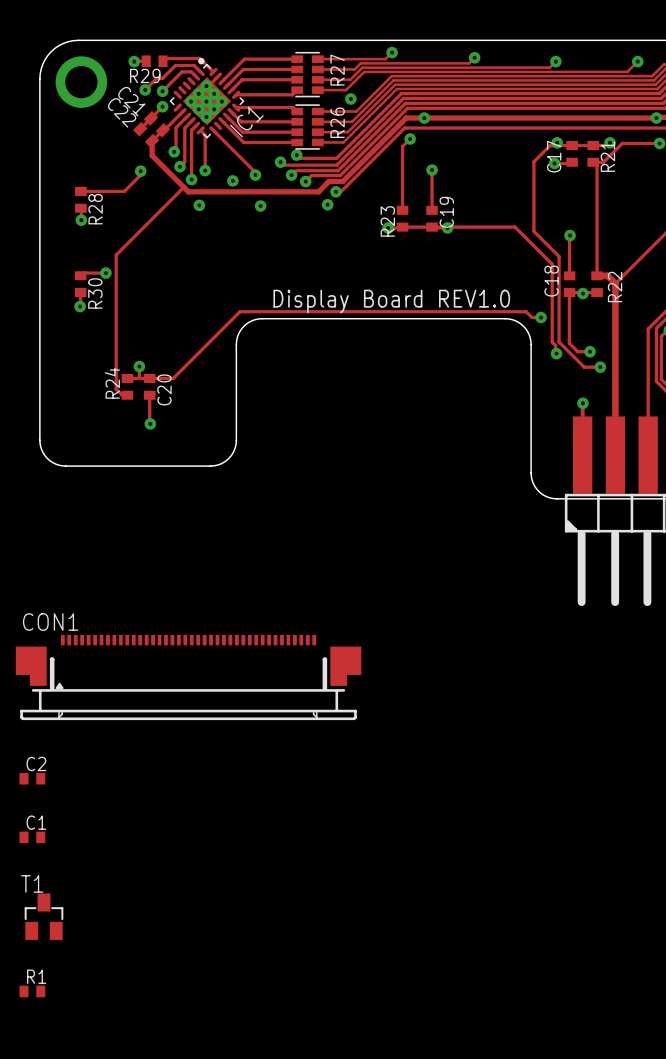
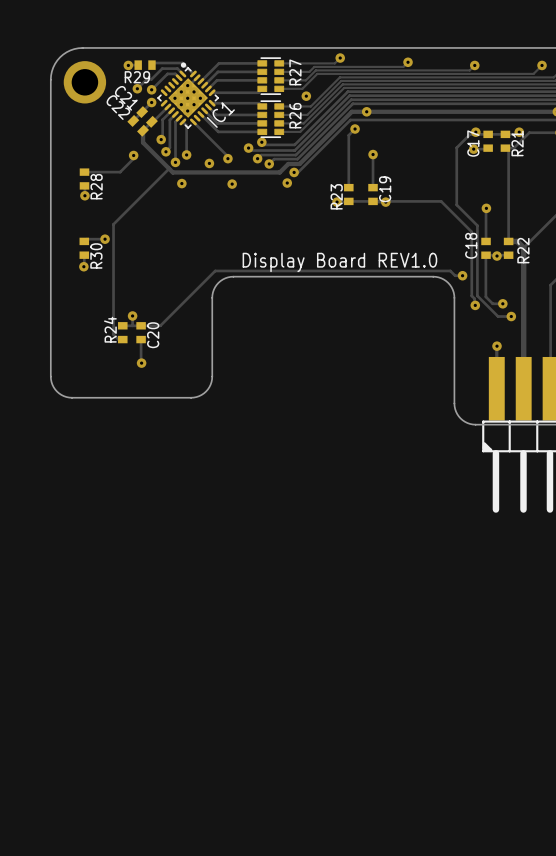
CON1: (188, 677) -> none
C2: (32, 778) -> none
C1: (32, 837) -> none
T1: (44, 916) -> none
R1: (32, 991) -> none

